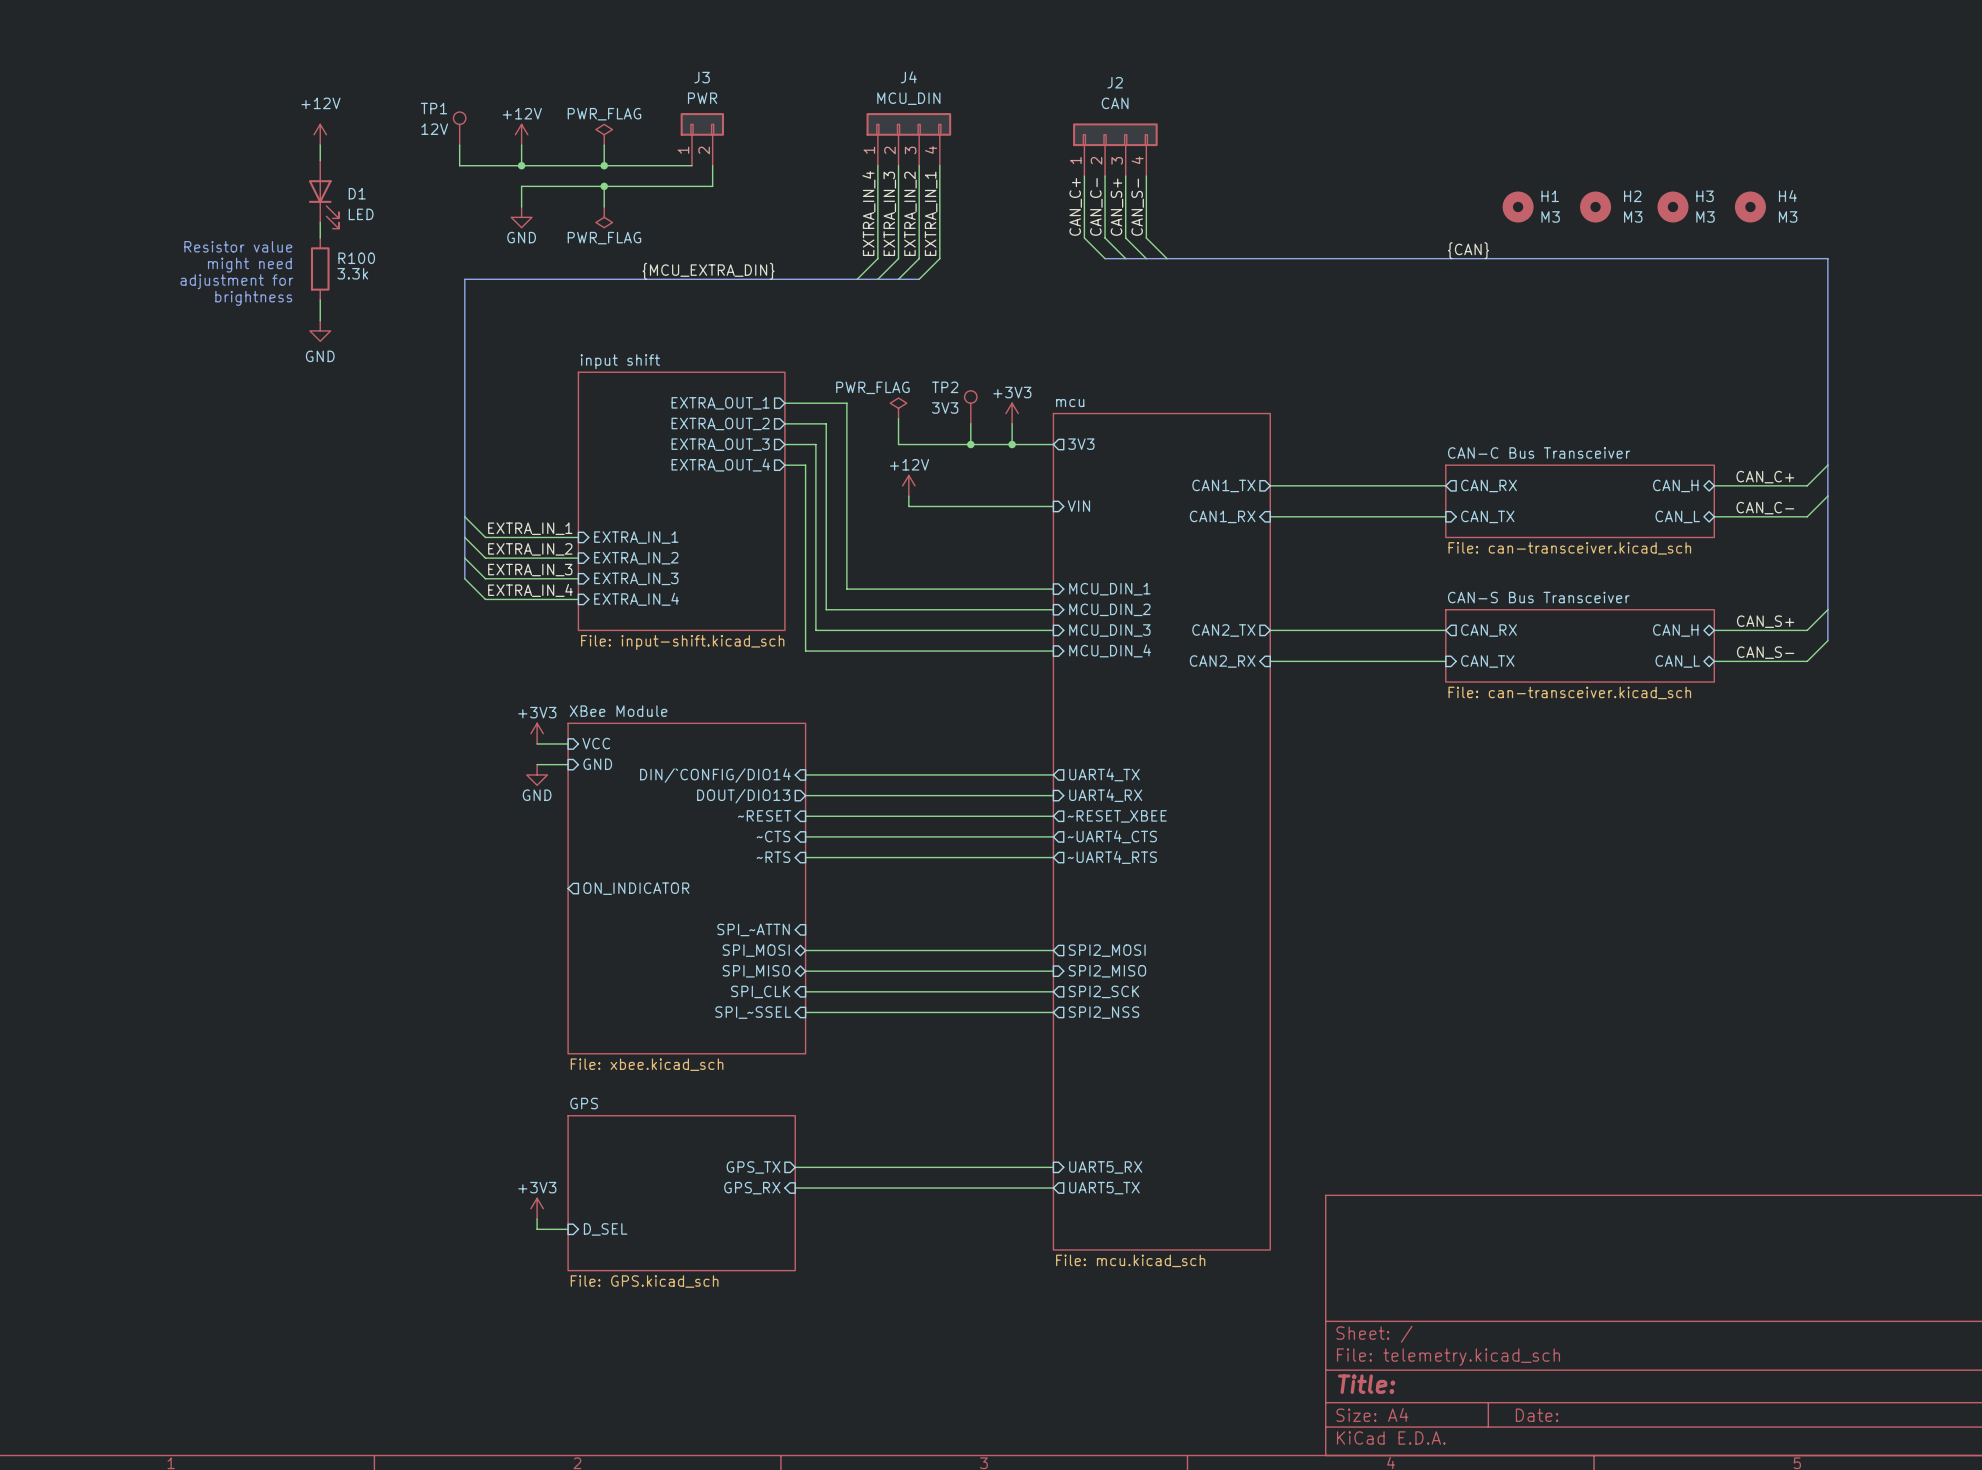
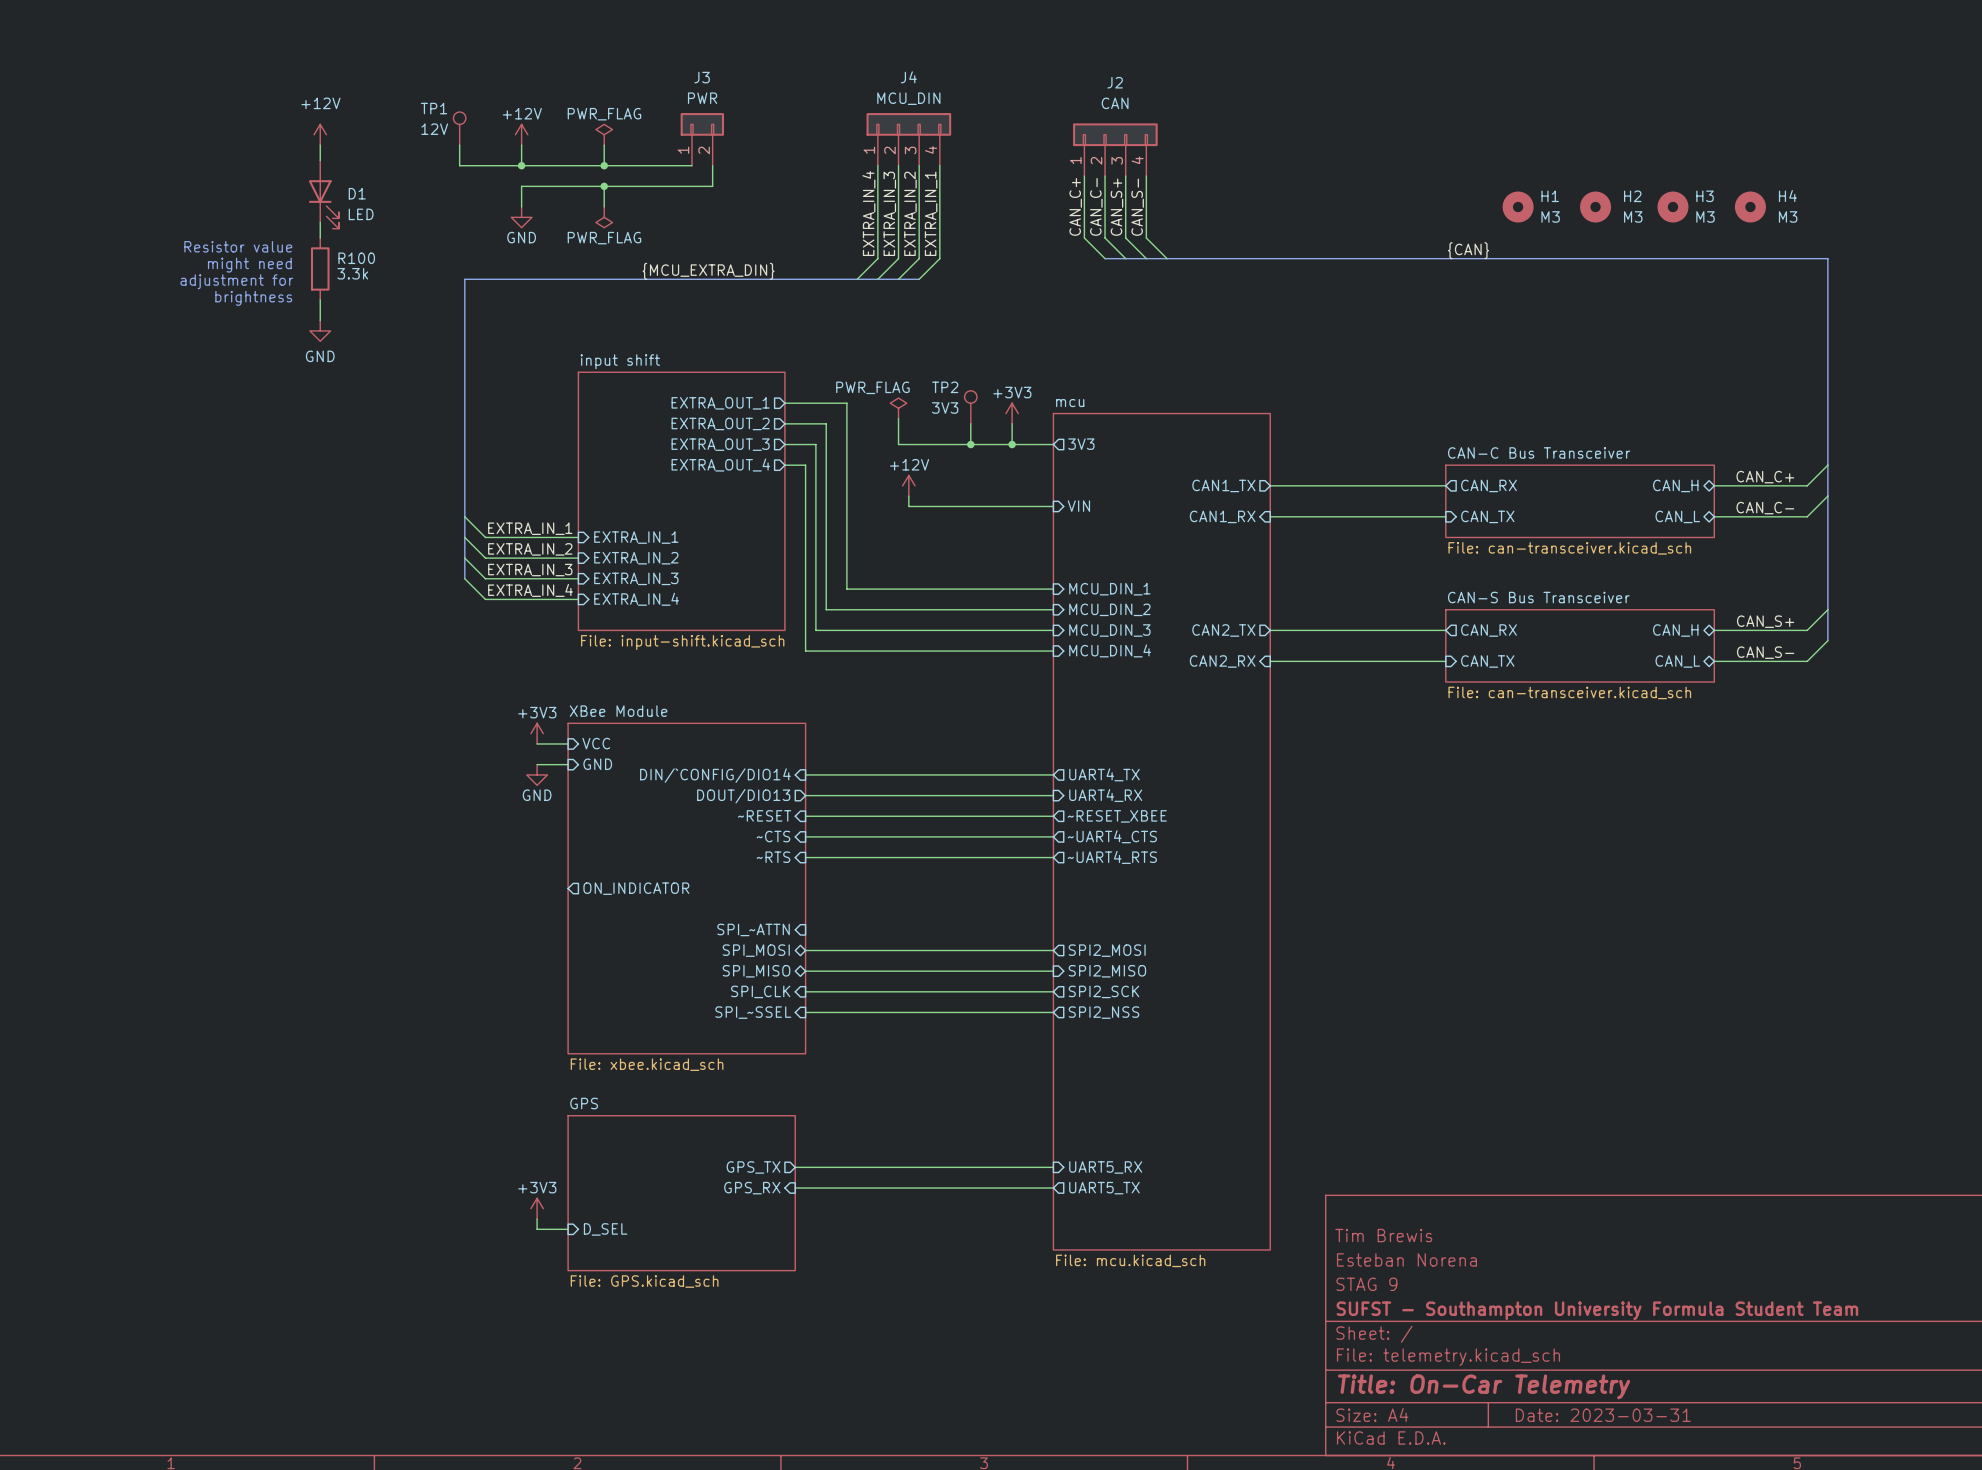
title block: none -> Tim Brewis (1383, 1235)
title block: none -> Esteban Norena (1406, 1259)
title block: none -> STAG 9 (1366, 1284)
title block: none -> SUFST - Southampton University Formula Student Team (1597, 1310)
title block: Title: (1366, 1384) -> Title: On-Car Telemetry (1484, 1386)
title block: Date: (1537, 1415) -> Date: 2023-03-31 (1603, 1415)

